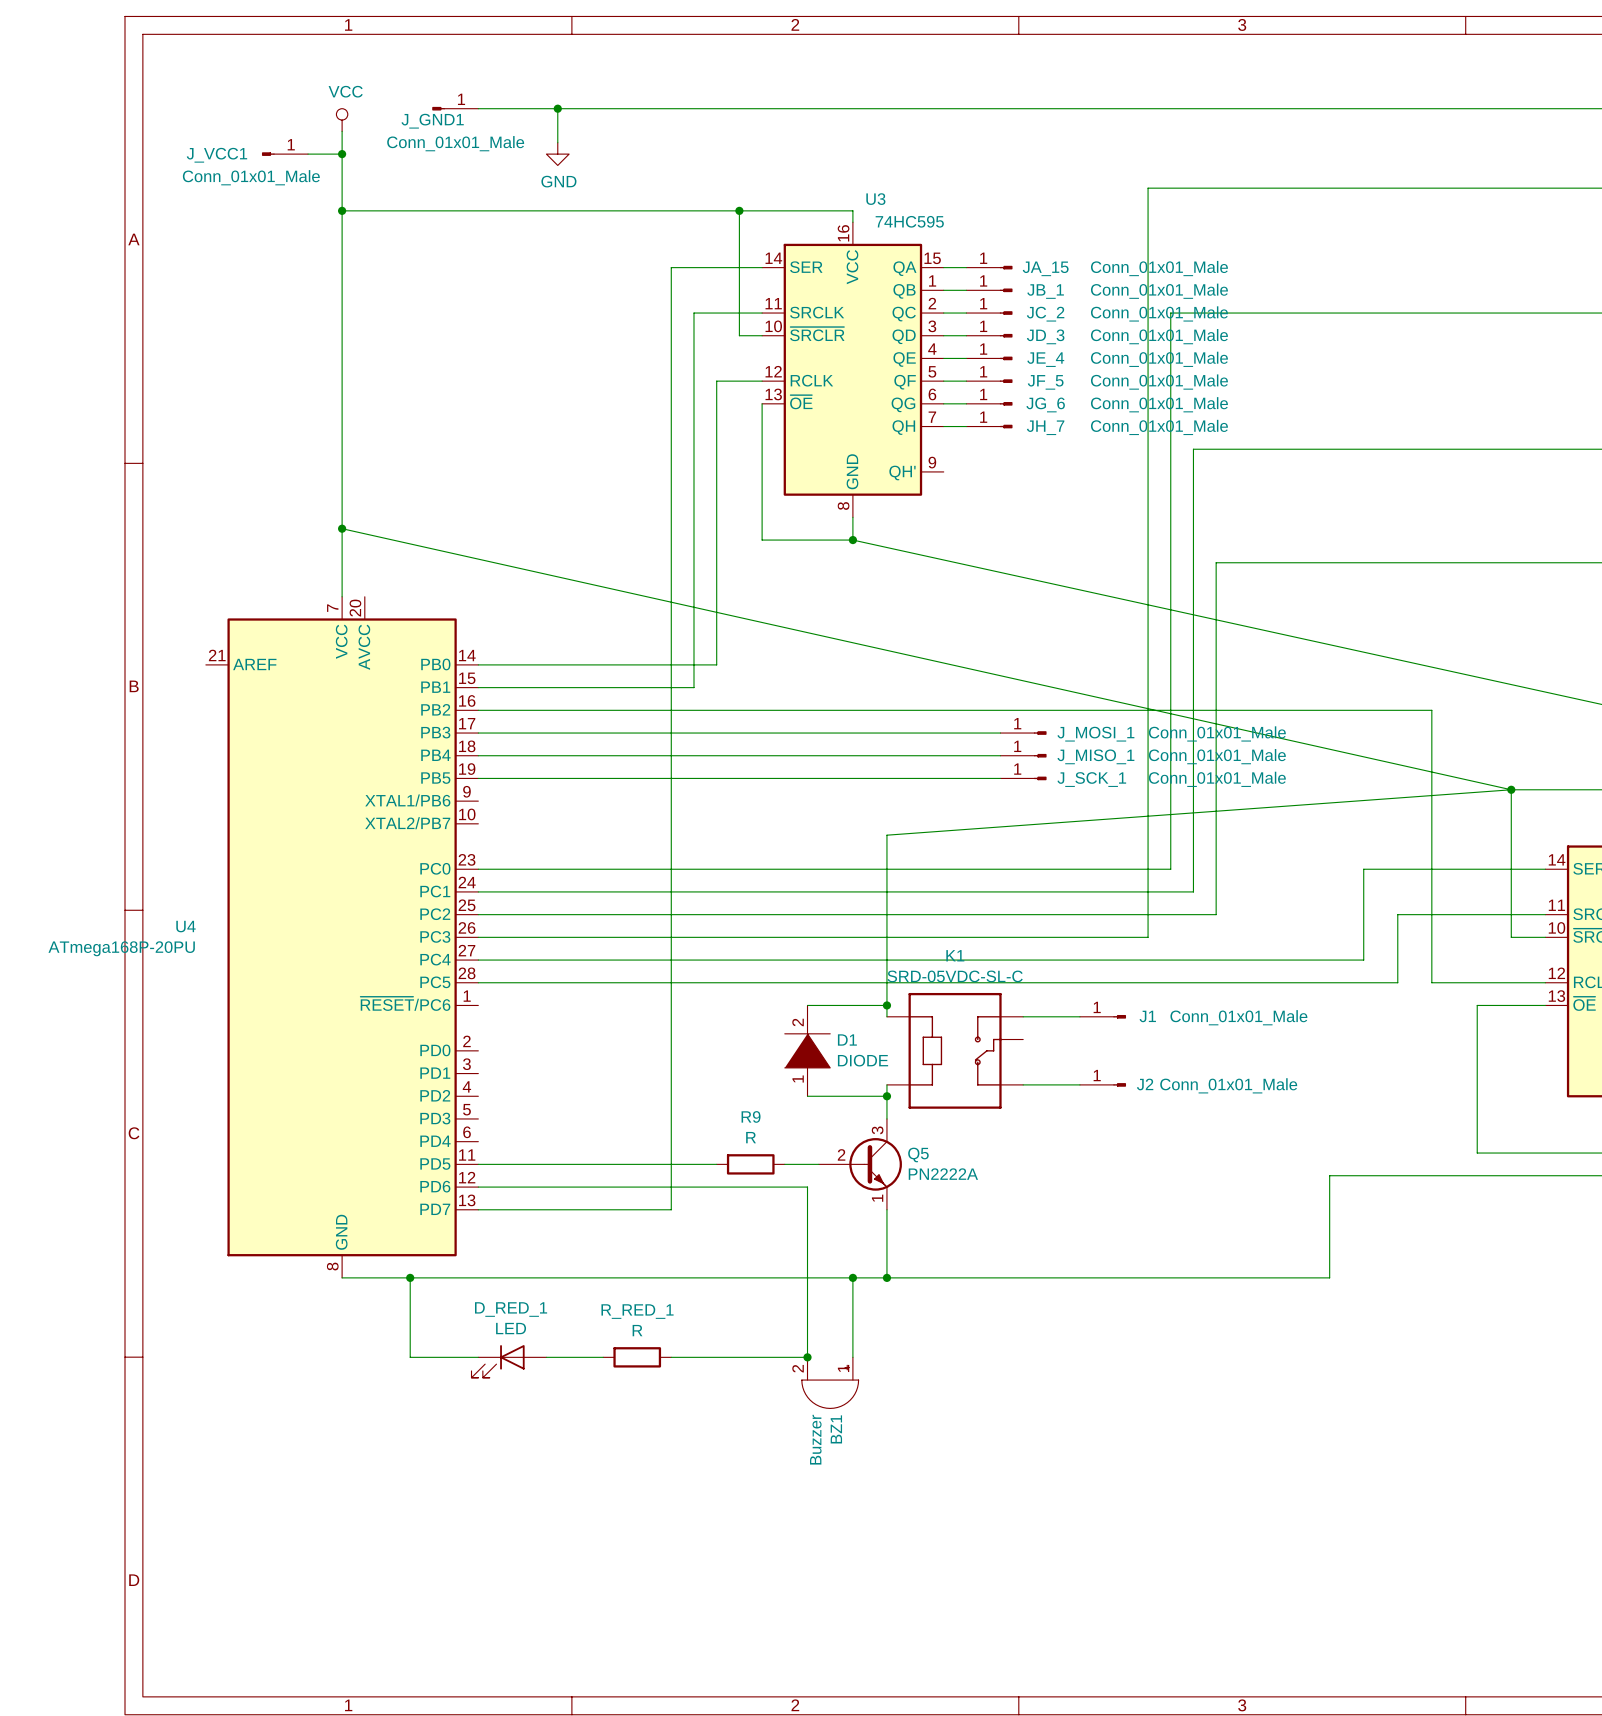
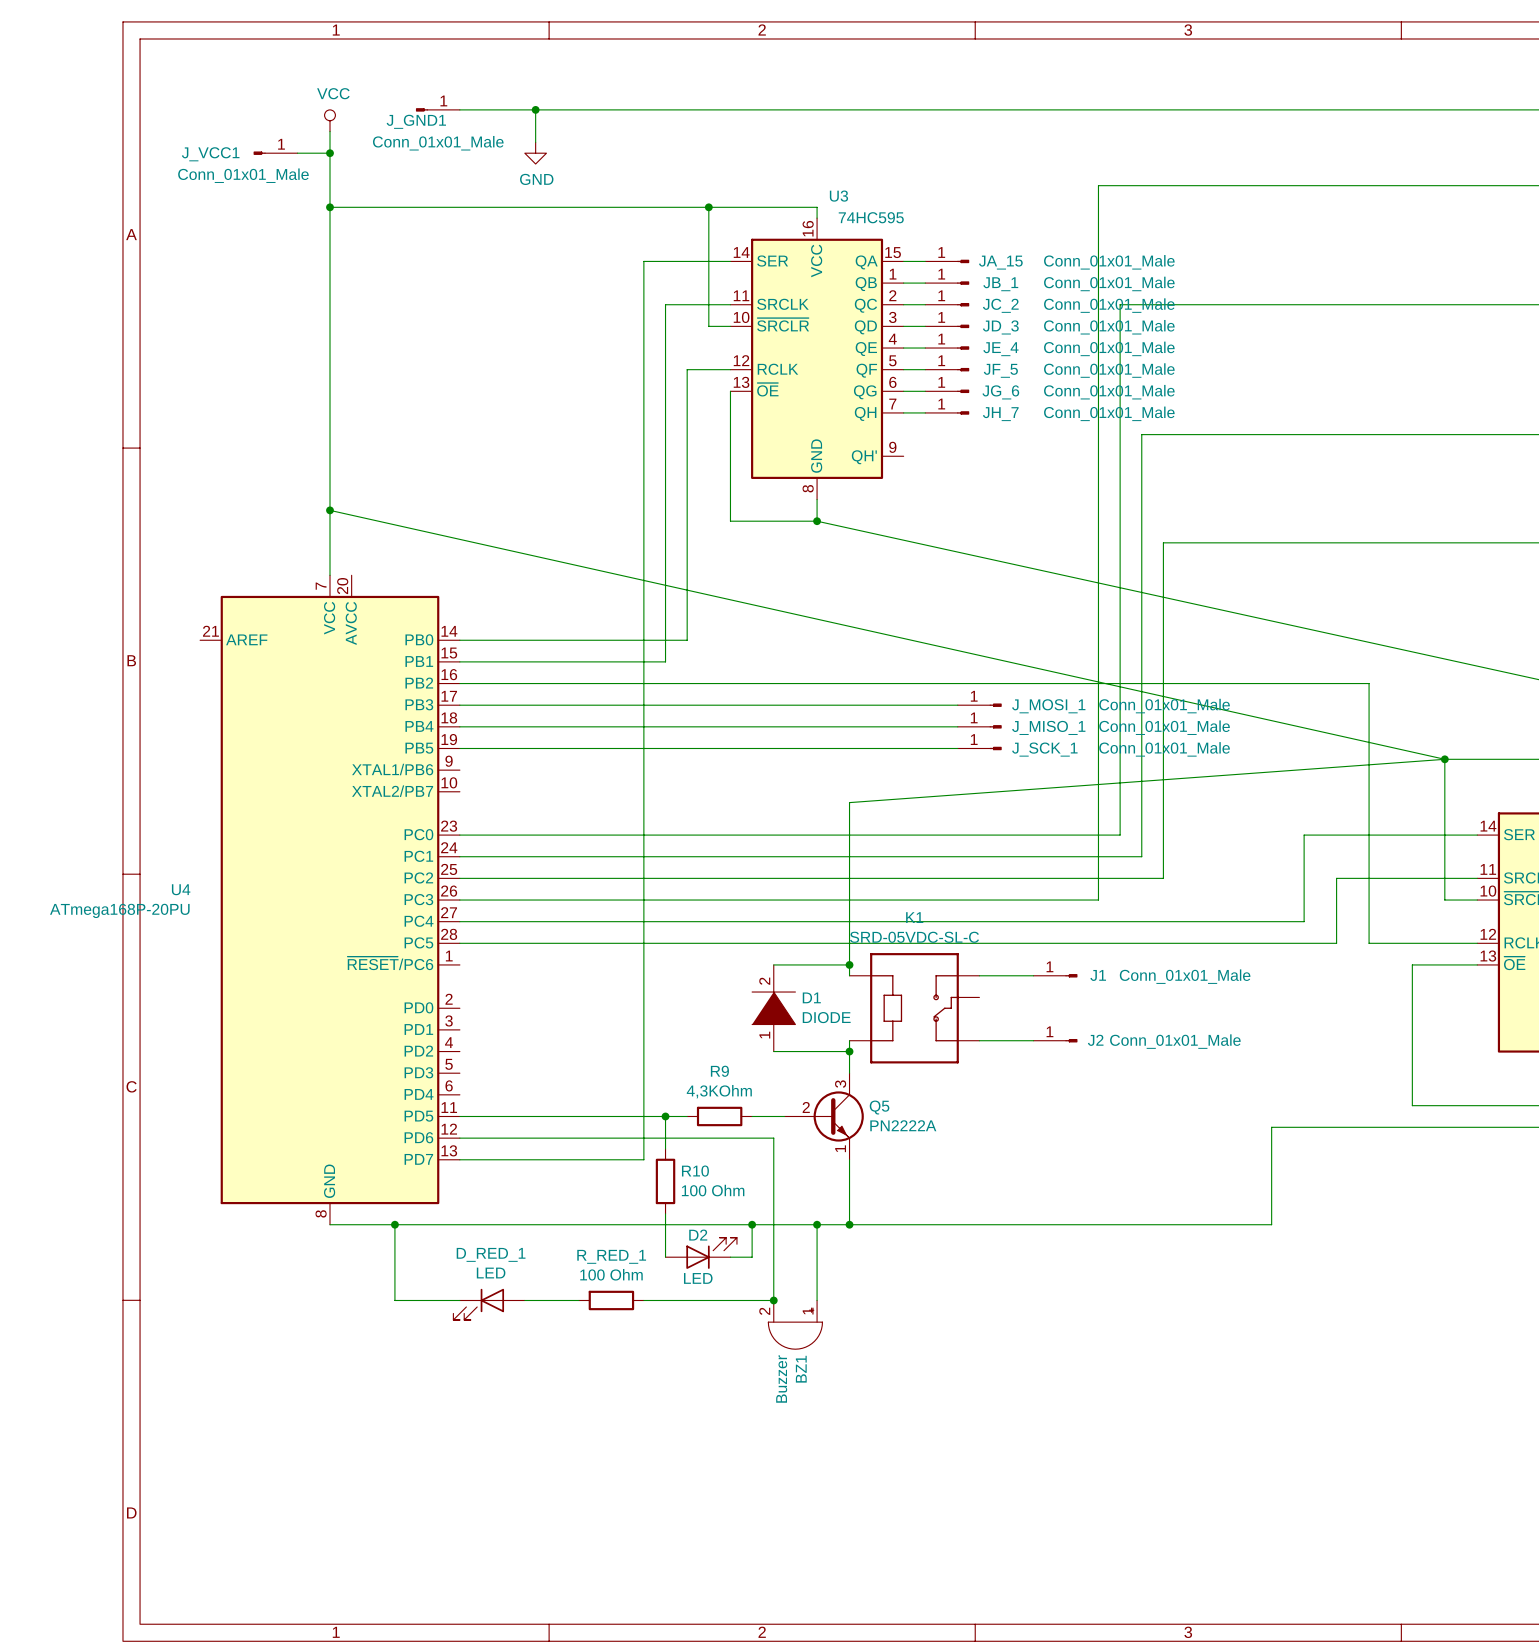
R9 value: R (751, 1137) -> 4,3KOhm (719, 1091)
wire: none -> (665, 1116) (665, 1148)
junction: none -> (665, 1116)
R10: none -> 100 Ohm (665, 1181)
wire: none -> (665, 1213) (665, 1257)
wire: none -> (752, 1224) (752, 1257) (730, 1257)
junction: none -> (752, 1224)
D2: none -> LED (701, 1253)
R_RED_1 value: R (637, 1330) -> 100 Ohm (611, 1274)

